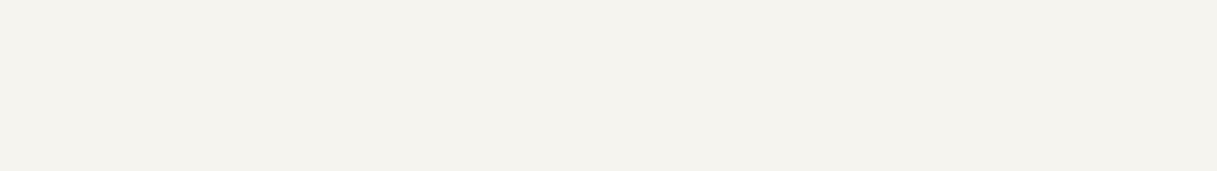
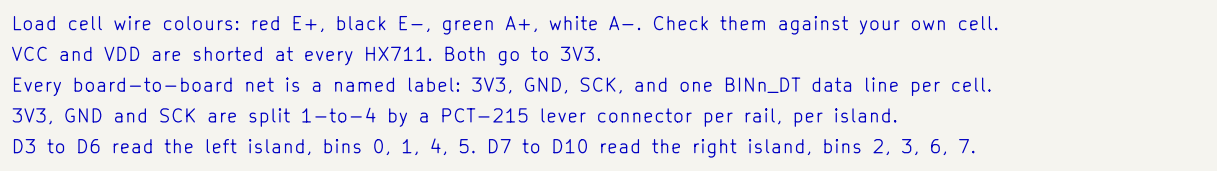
text: none -> Load cell wire colours: red E+, black E-, green A+, white A-. Check them against your own cell. (505, 25)
text: none -> VCC and VDD are shorted at every HX711. Both go to 3V3. (305, 56)
text: none -> Every board-to-board net is a named label: 3V3, GND, SCK, and one BINn_DT data line per cell. (502, 86)
text: none -> 3V3, GND and SCK are split 1-to-4 by a PCT-215 lever connector per rail, per island. (454, 117)
text: none -> D3 to D6 read the left island, bins 0, 1, 4, 5. D7 to D10 read the right island, bins 2, 3, 6, 7. (494, 148)

